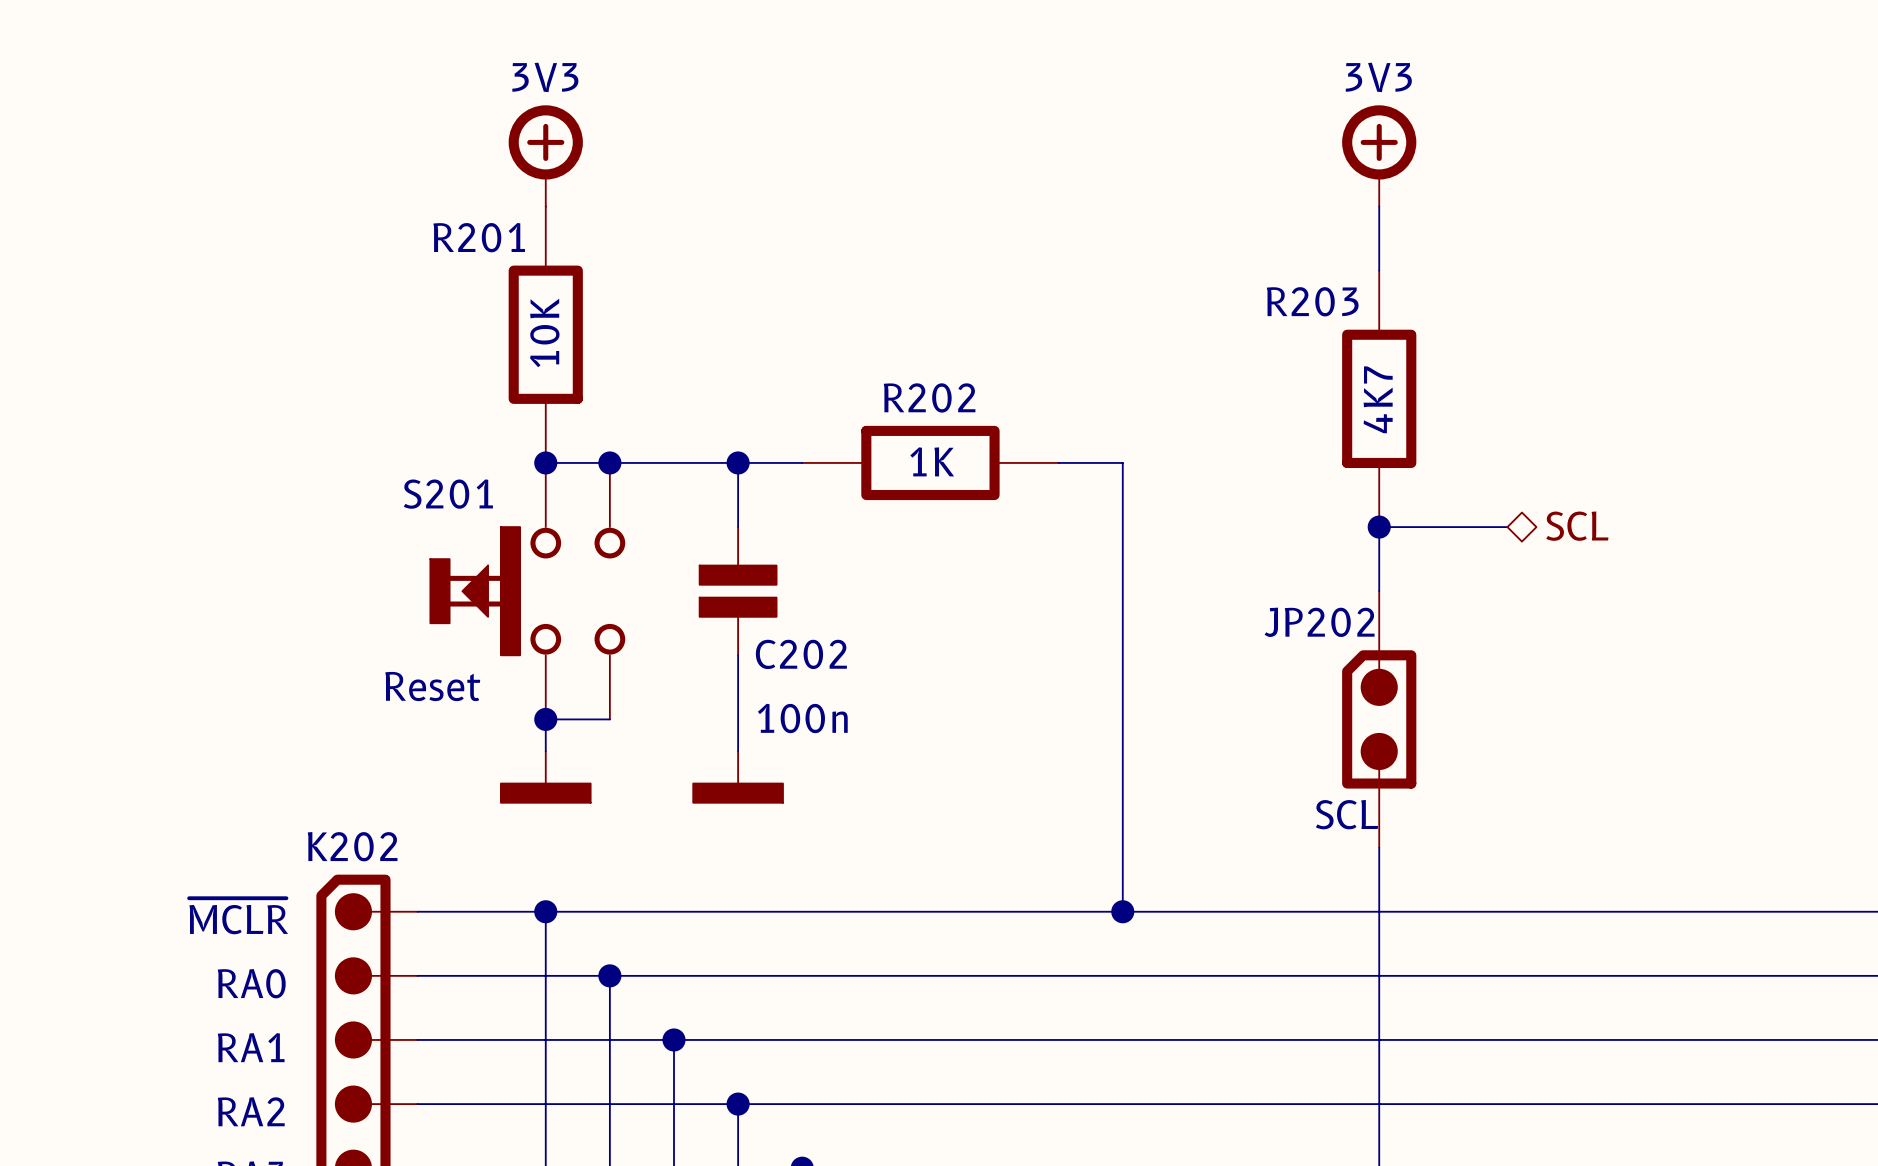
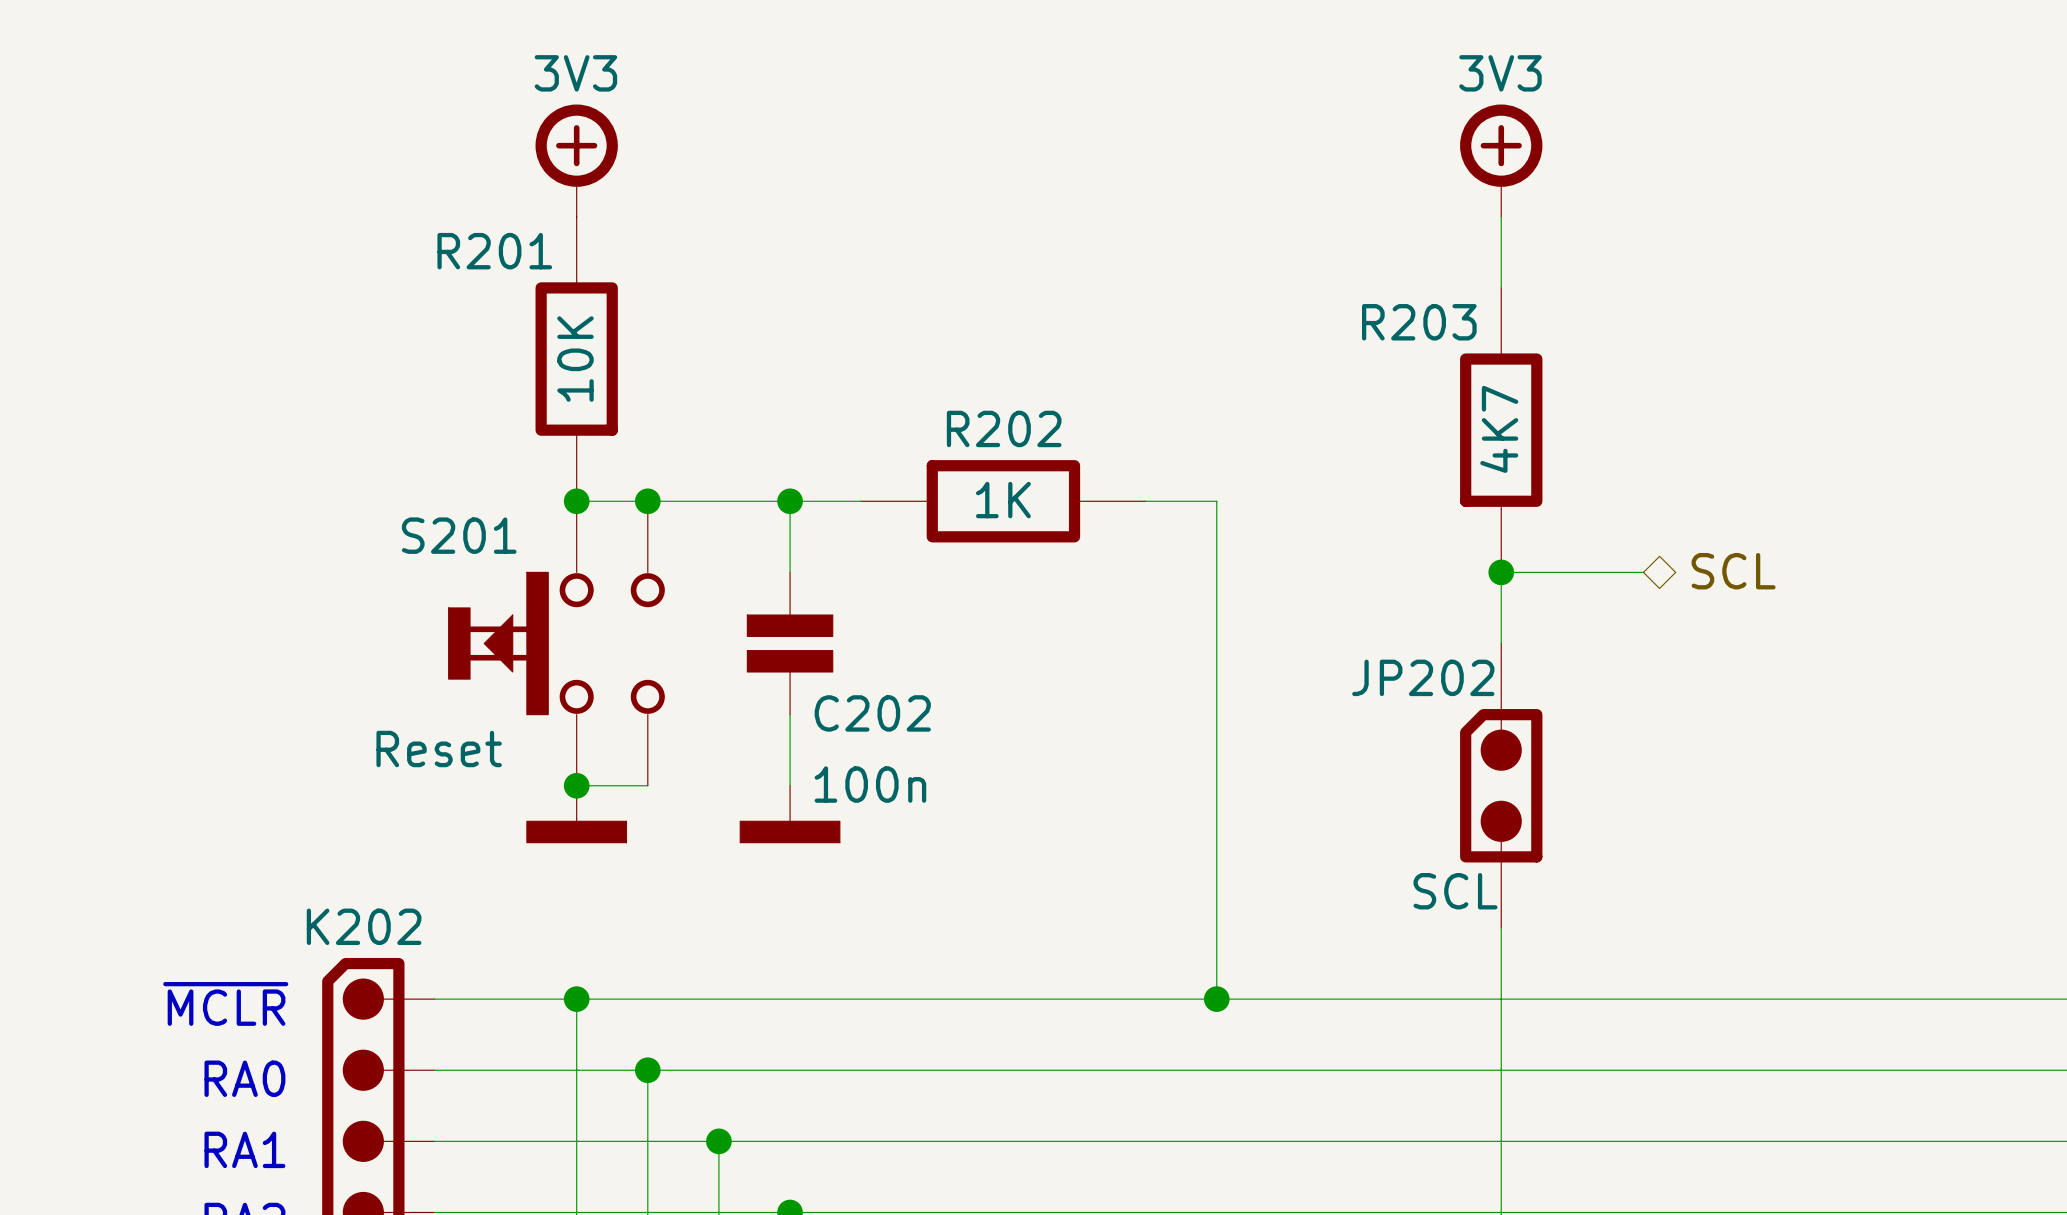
power symbol position: (545, 777) -> (576, 814)
power symbol position: (738, 777) -> (790, 814)

